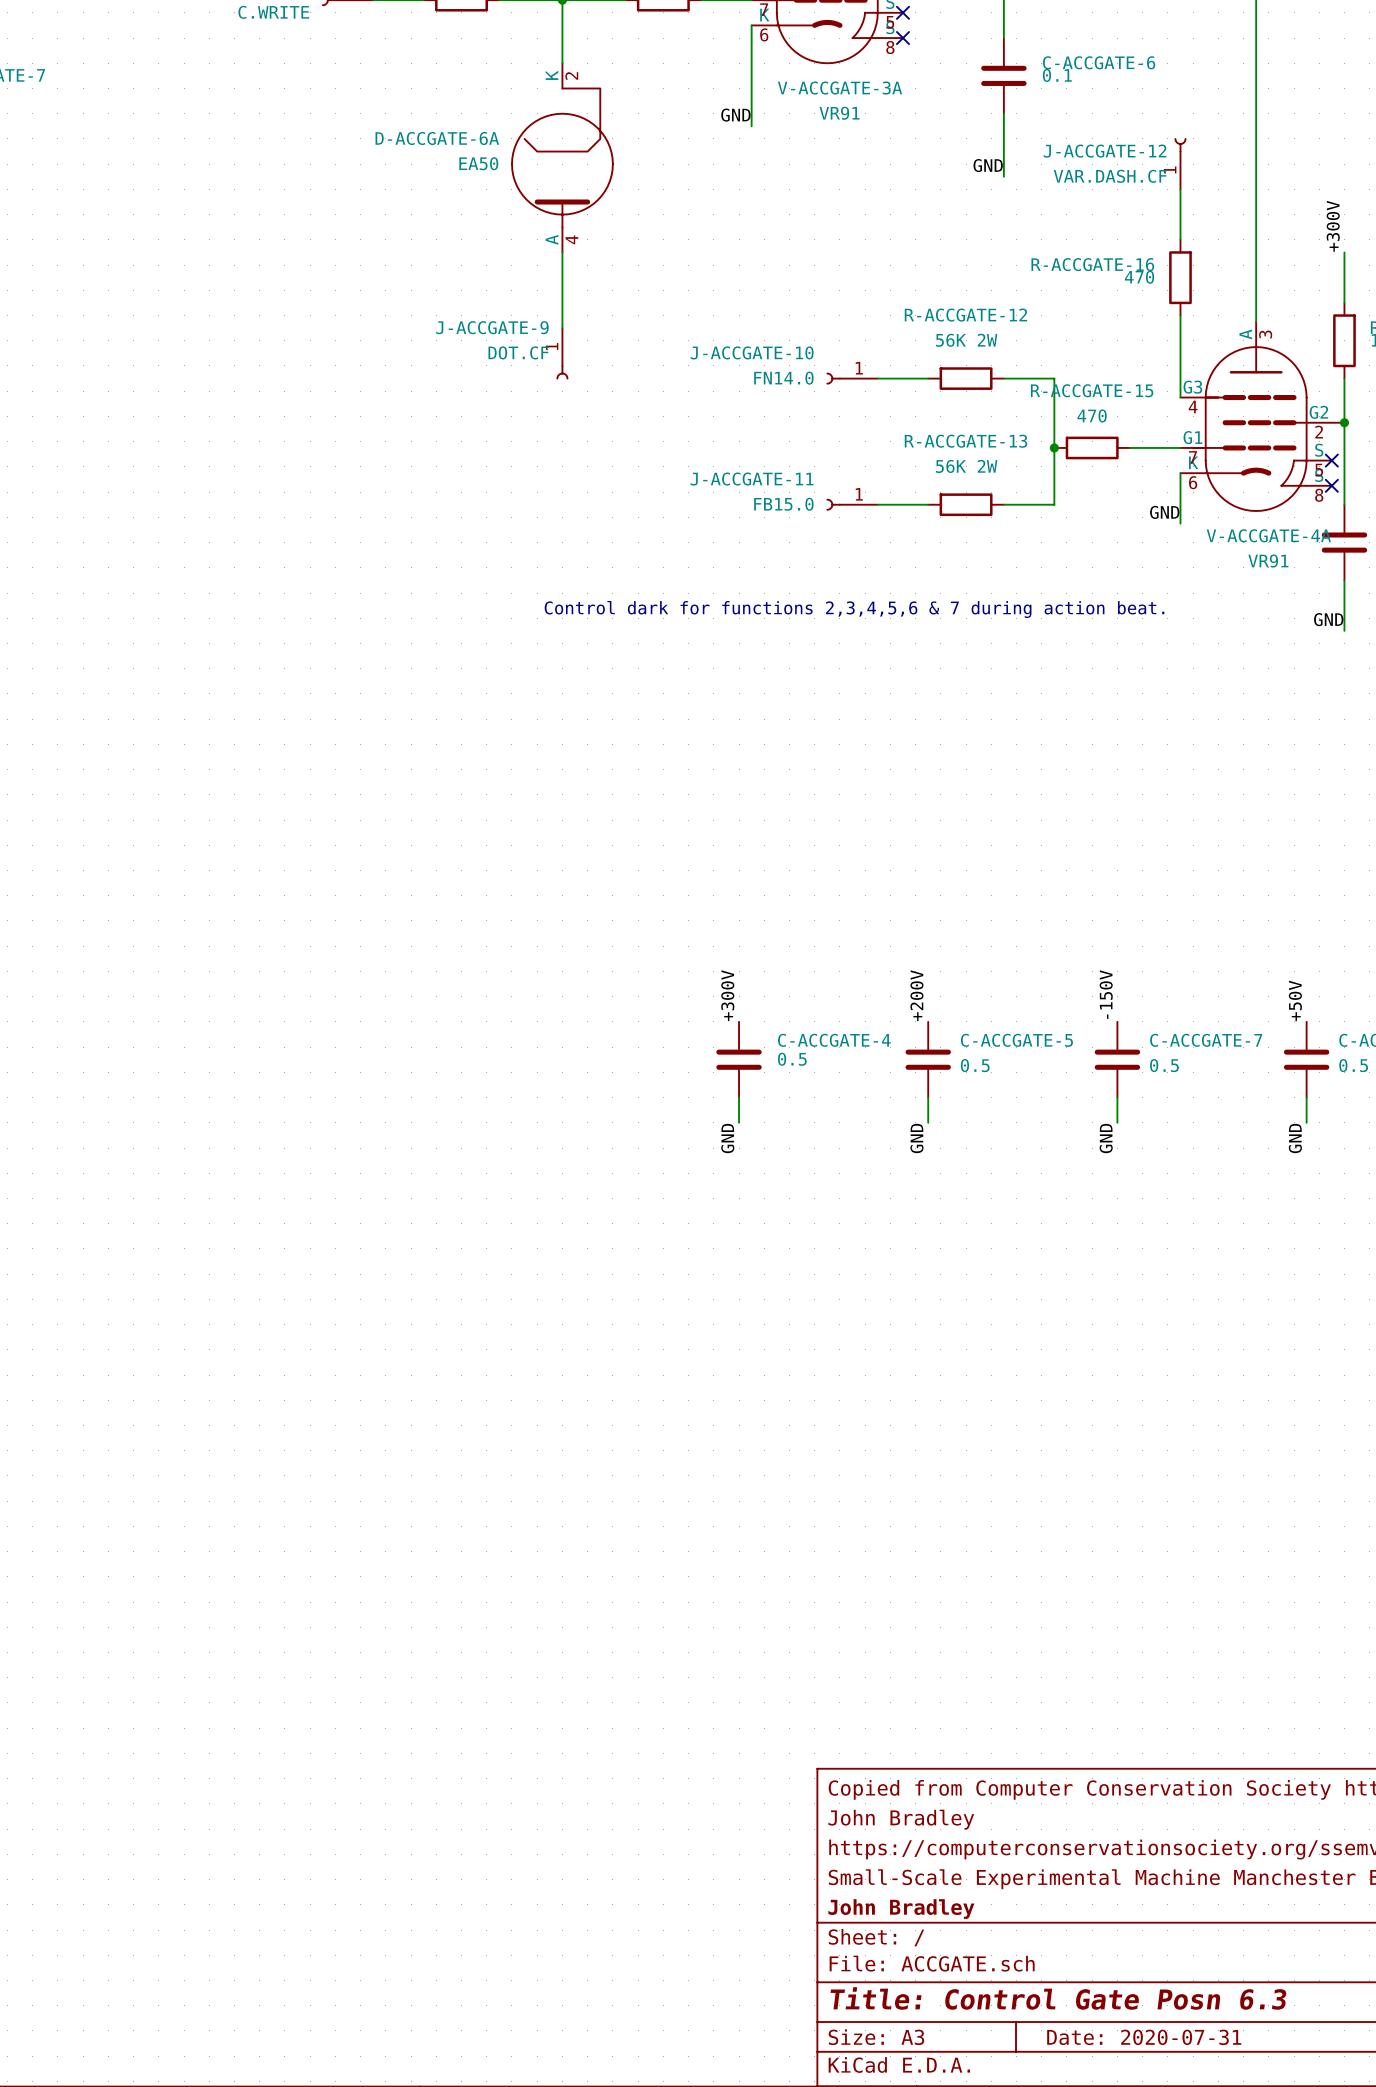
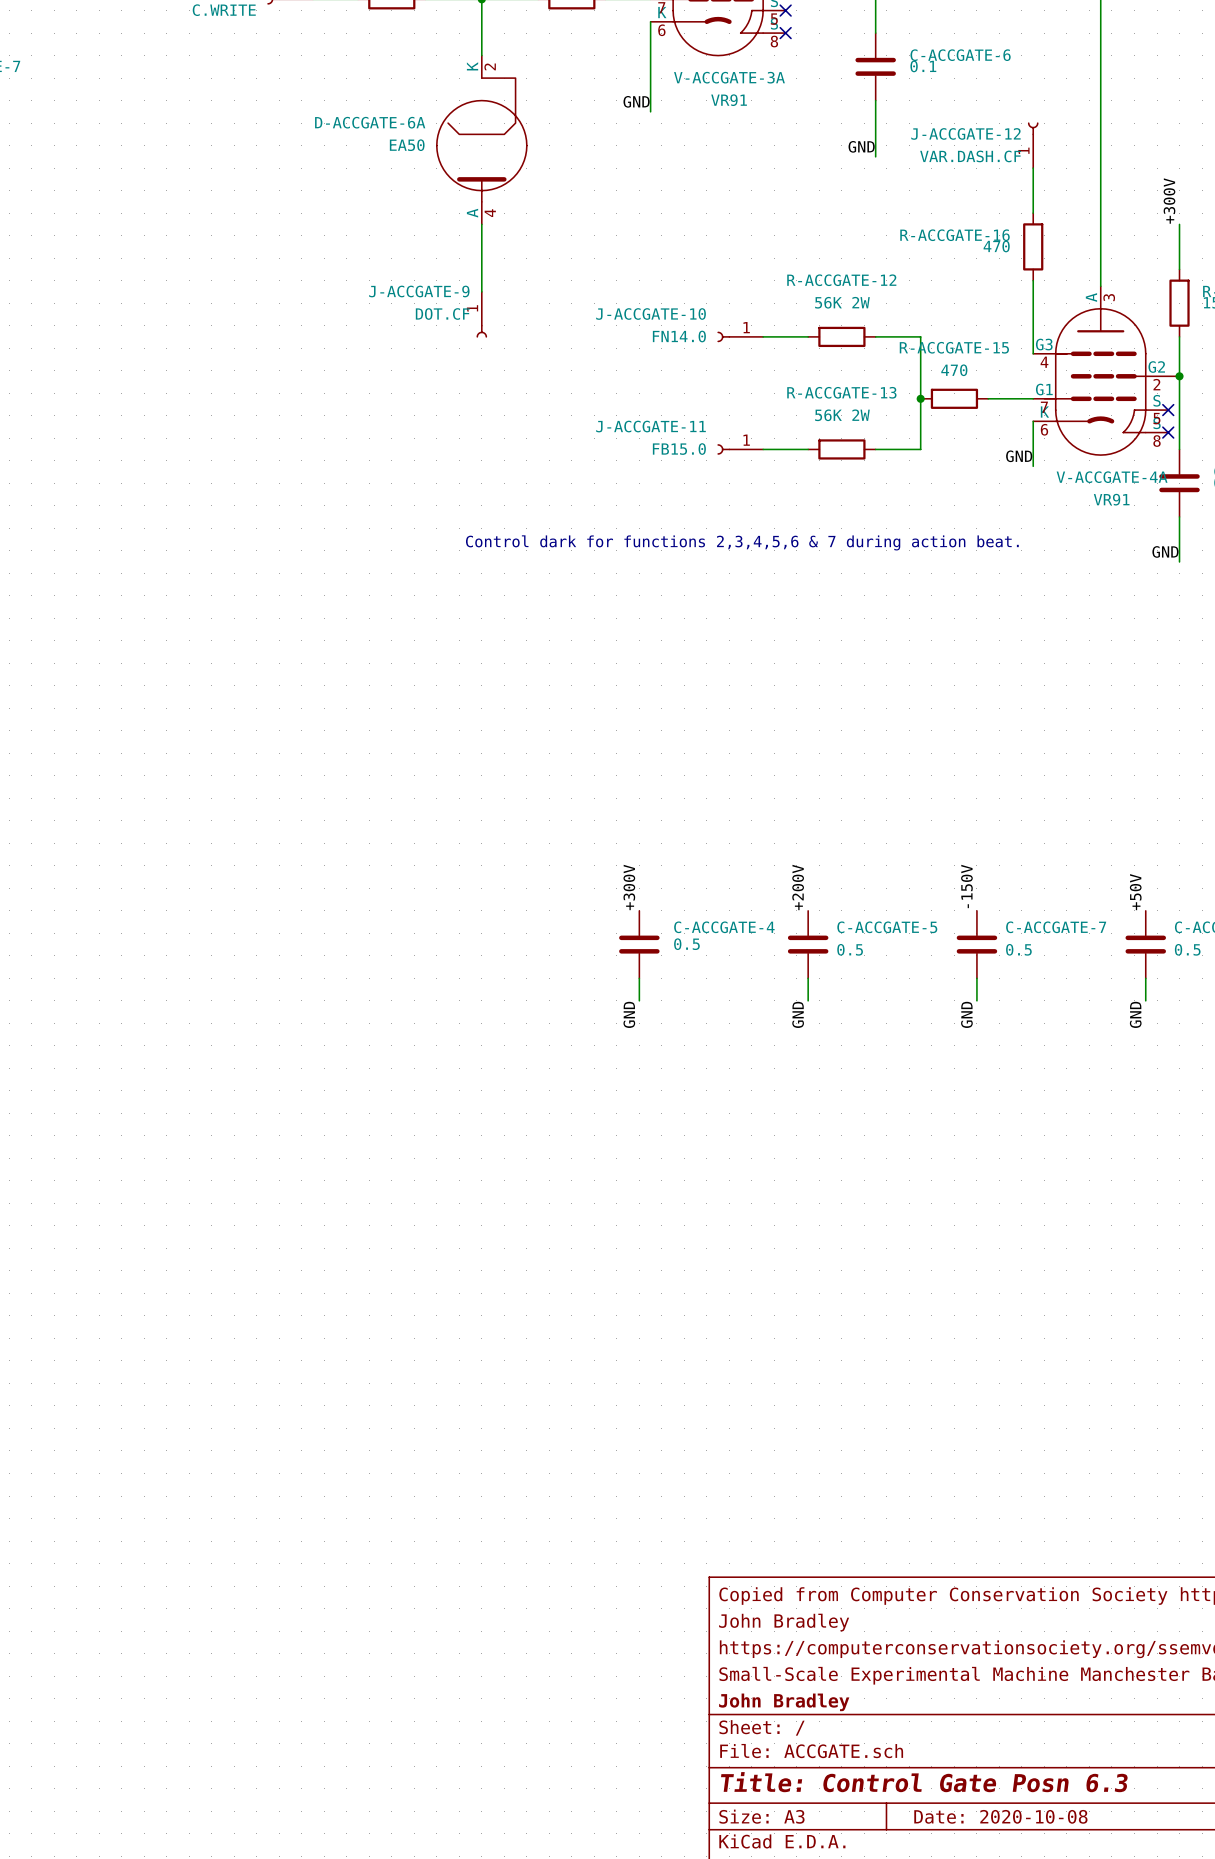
title block: Date: 2020-07-31 (1144, 2037) -> Date: 2020-10-08 (1000, 1816)

